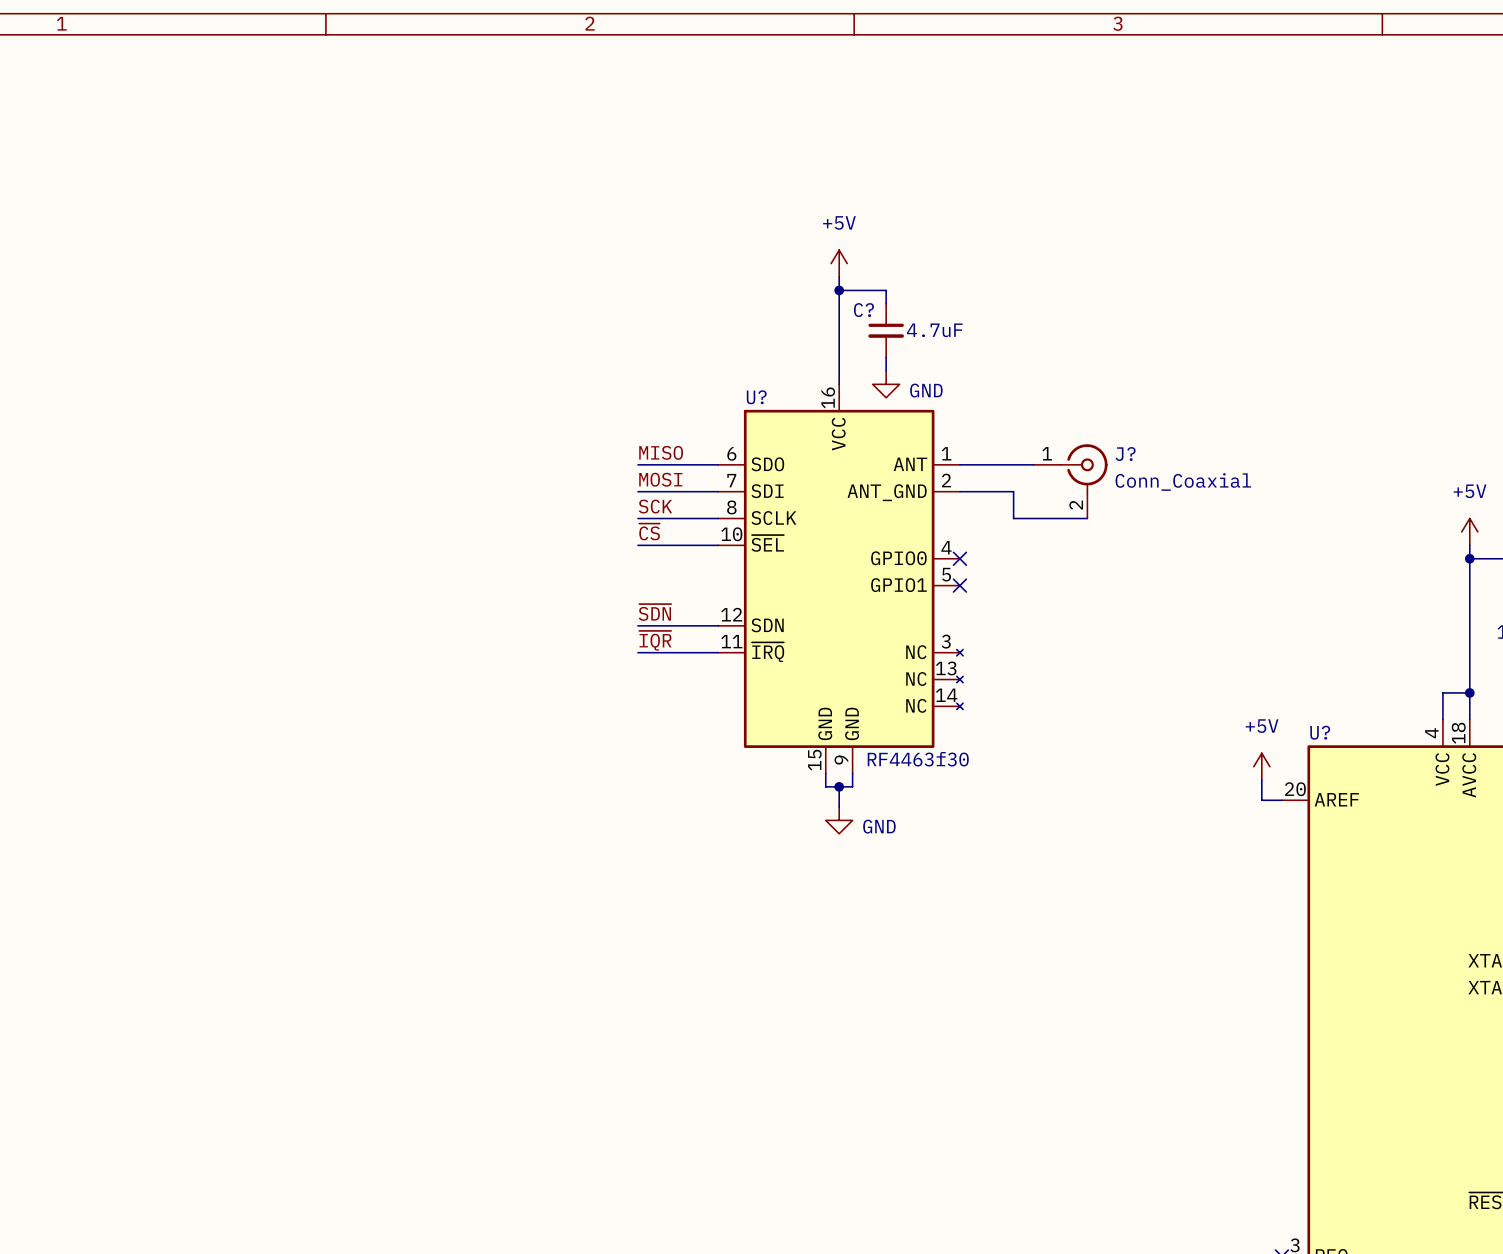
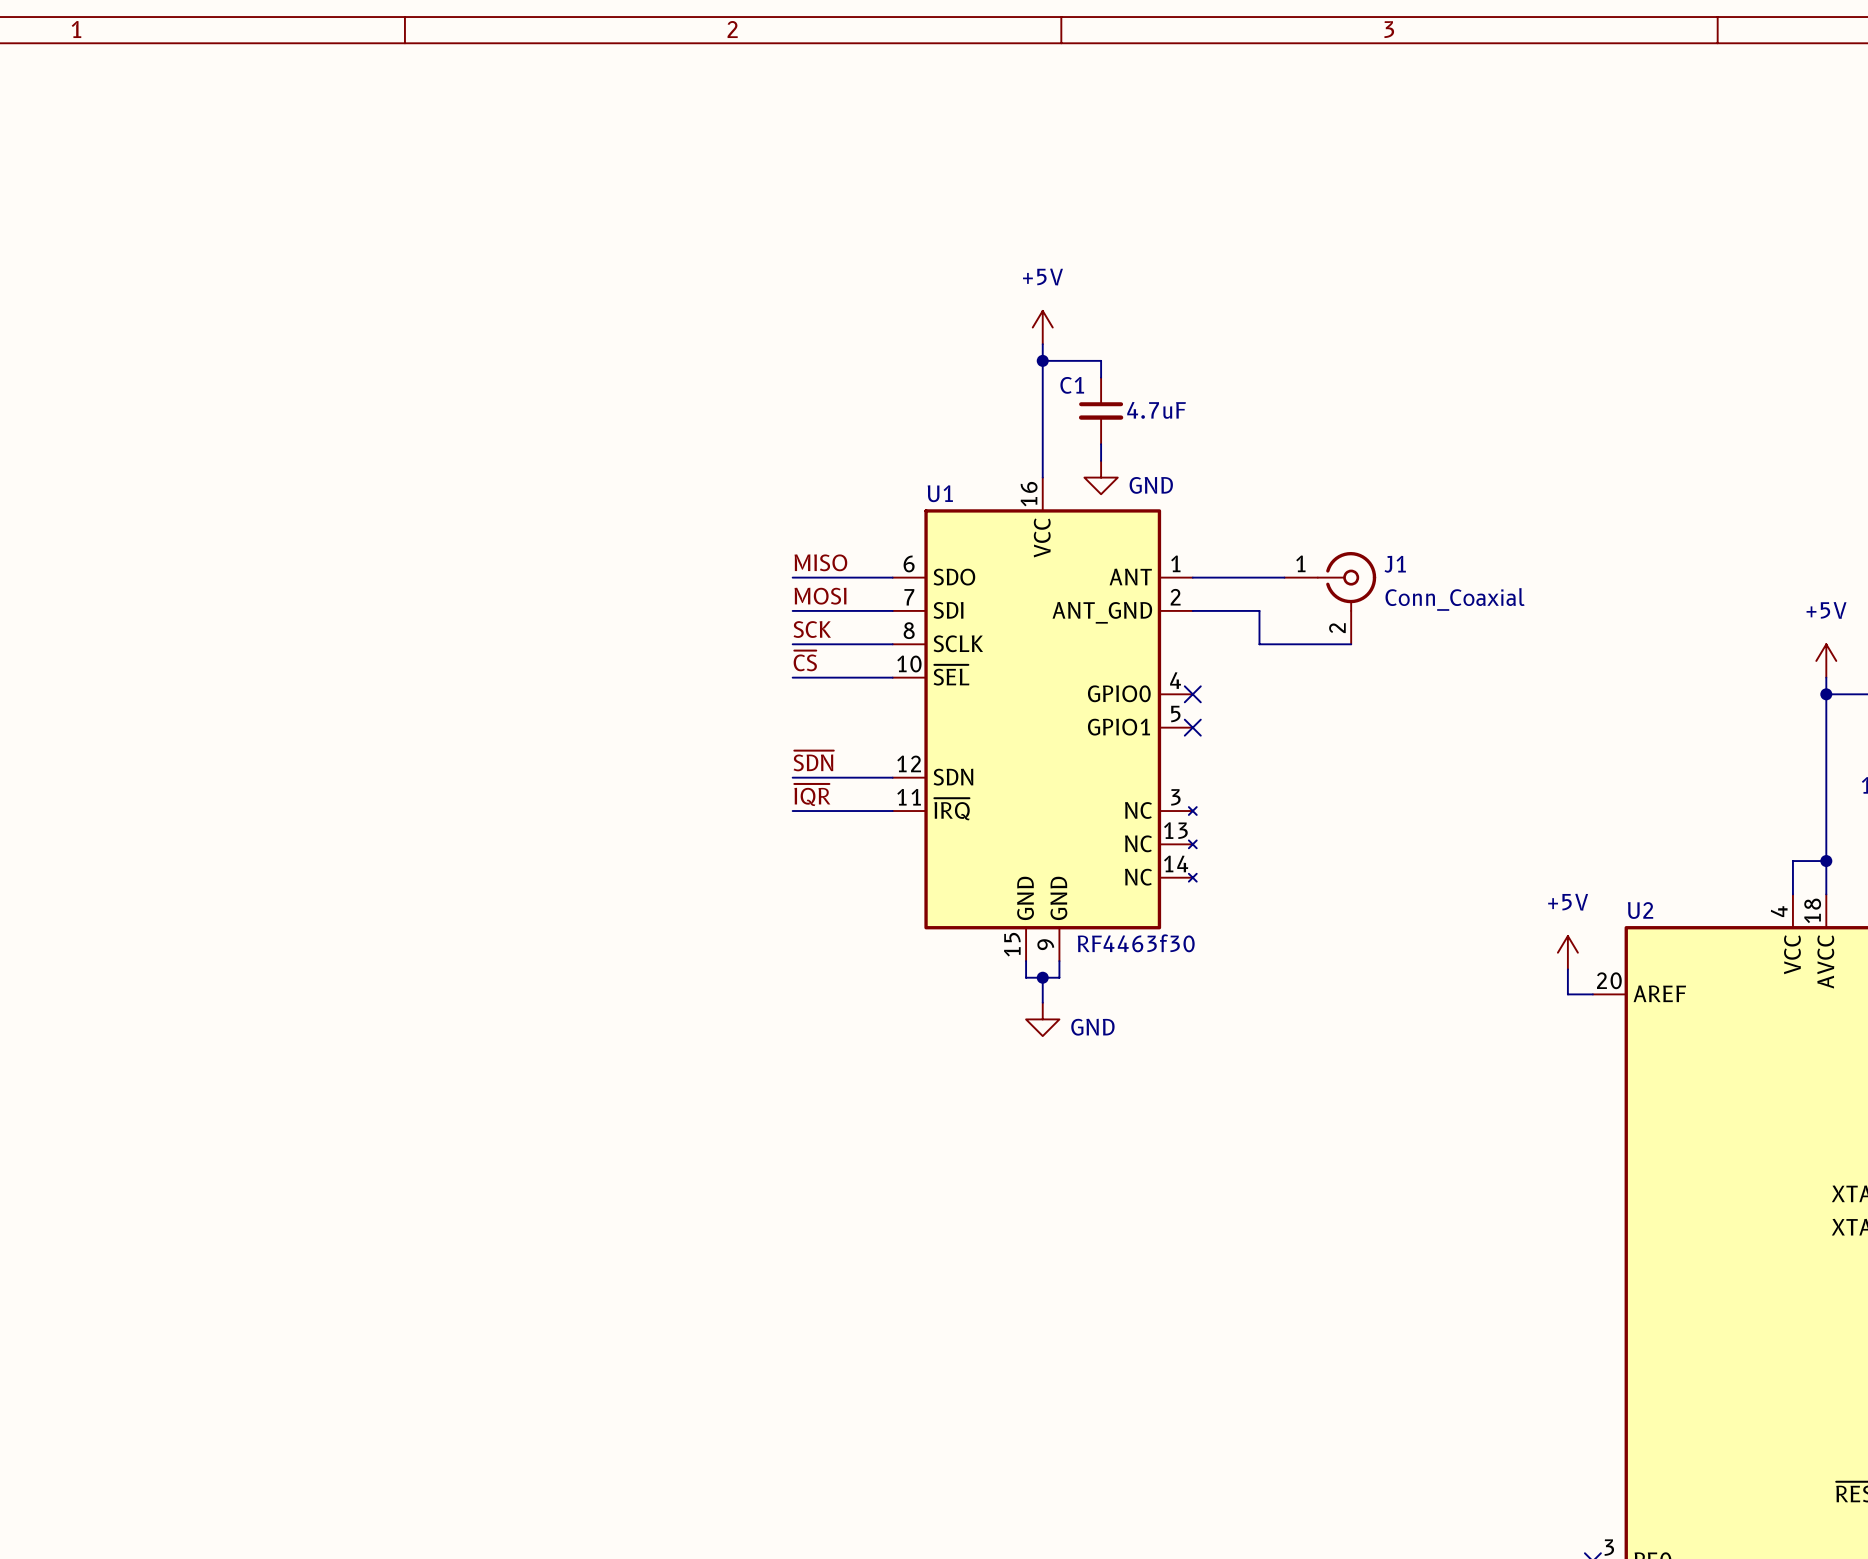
C? name: C? (863, 310) -> C1 (1072, 385)
U? name: U? (756, 397) -> U1 (940, 493)
J? name: J? (1125, 454) -> J1 (1395, 564)
U? name: U? (1320, 732) -> U2 (1640, 910)

